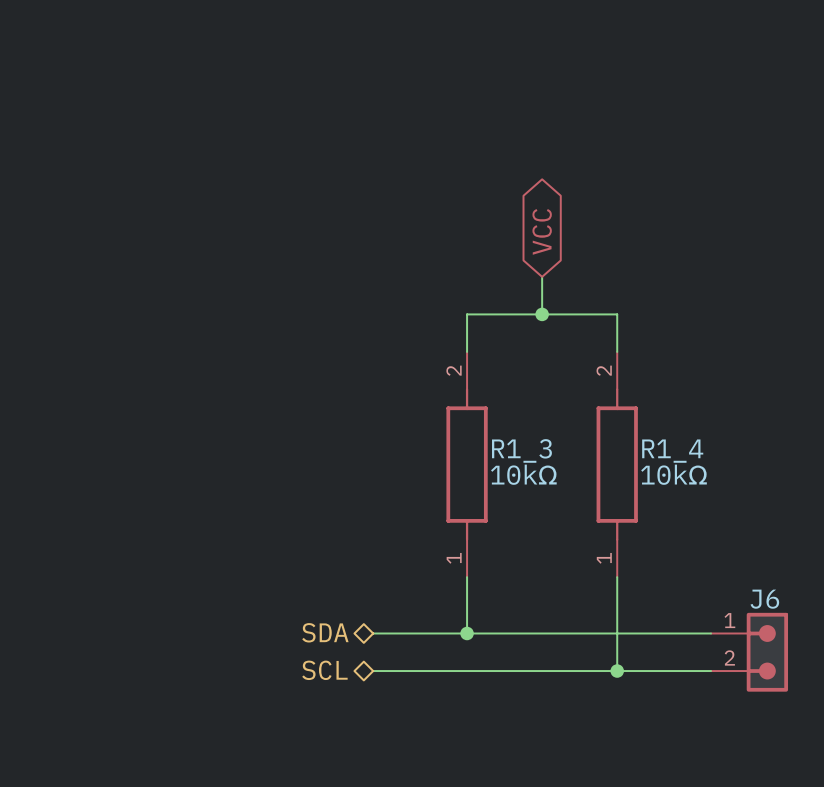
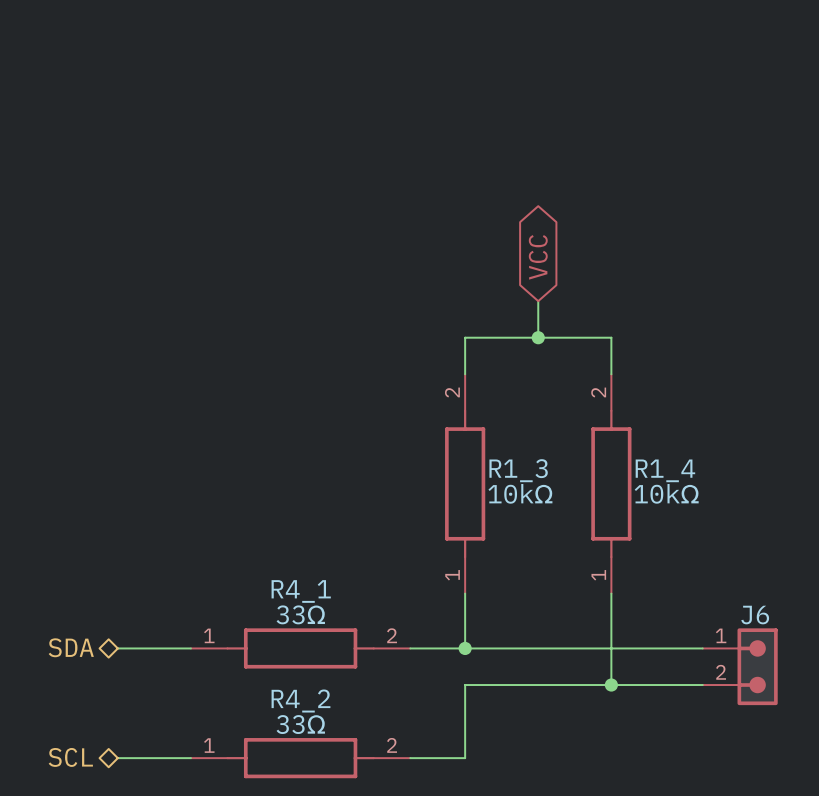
hierarchical label position: SDA (325, 632) -> SDA (71, 647)
wire: none -> (117, 648) (190, 648)
R4_1: none -> 33Ω (300, 648)
hierarchical label position: SCL (324, 670) -> SCL (70, 757)
wire: (373, 671) (467, 671) -> (410, 758) (465, 758) (465, 685)
wire: none -> (117, 758) (190, 758)
R4_2: none -> 33Ω (300, 758)

